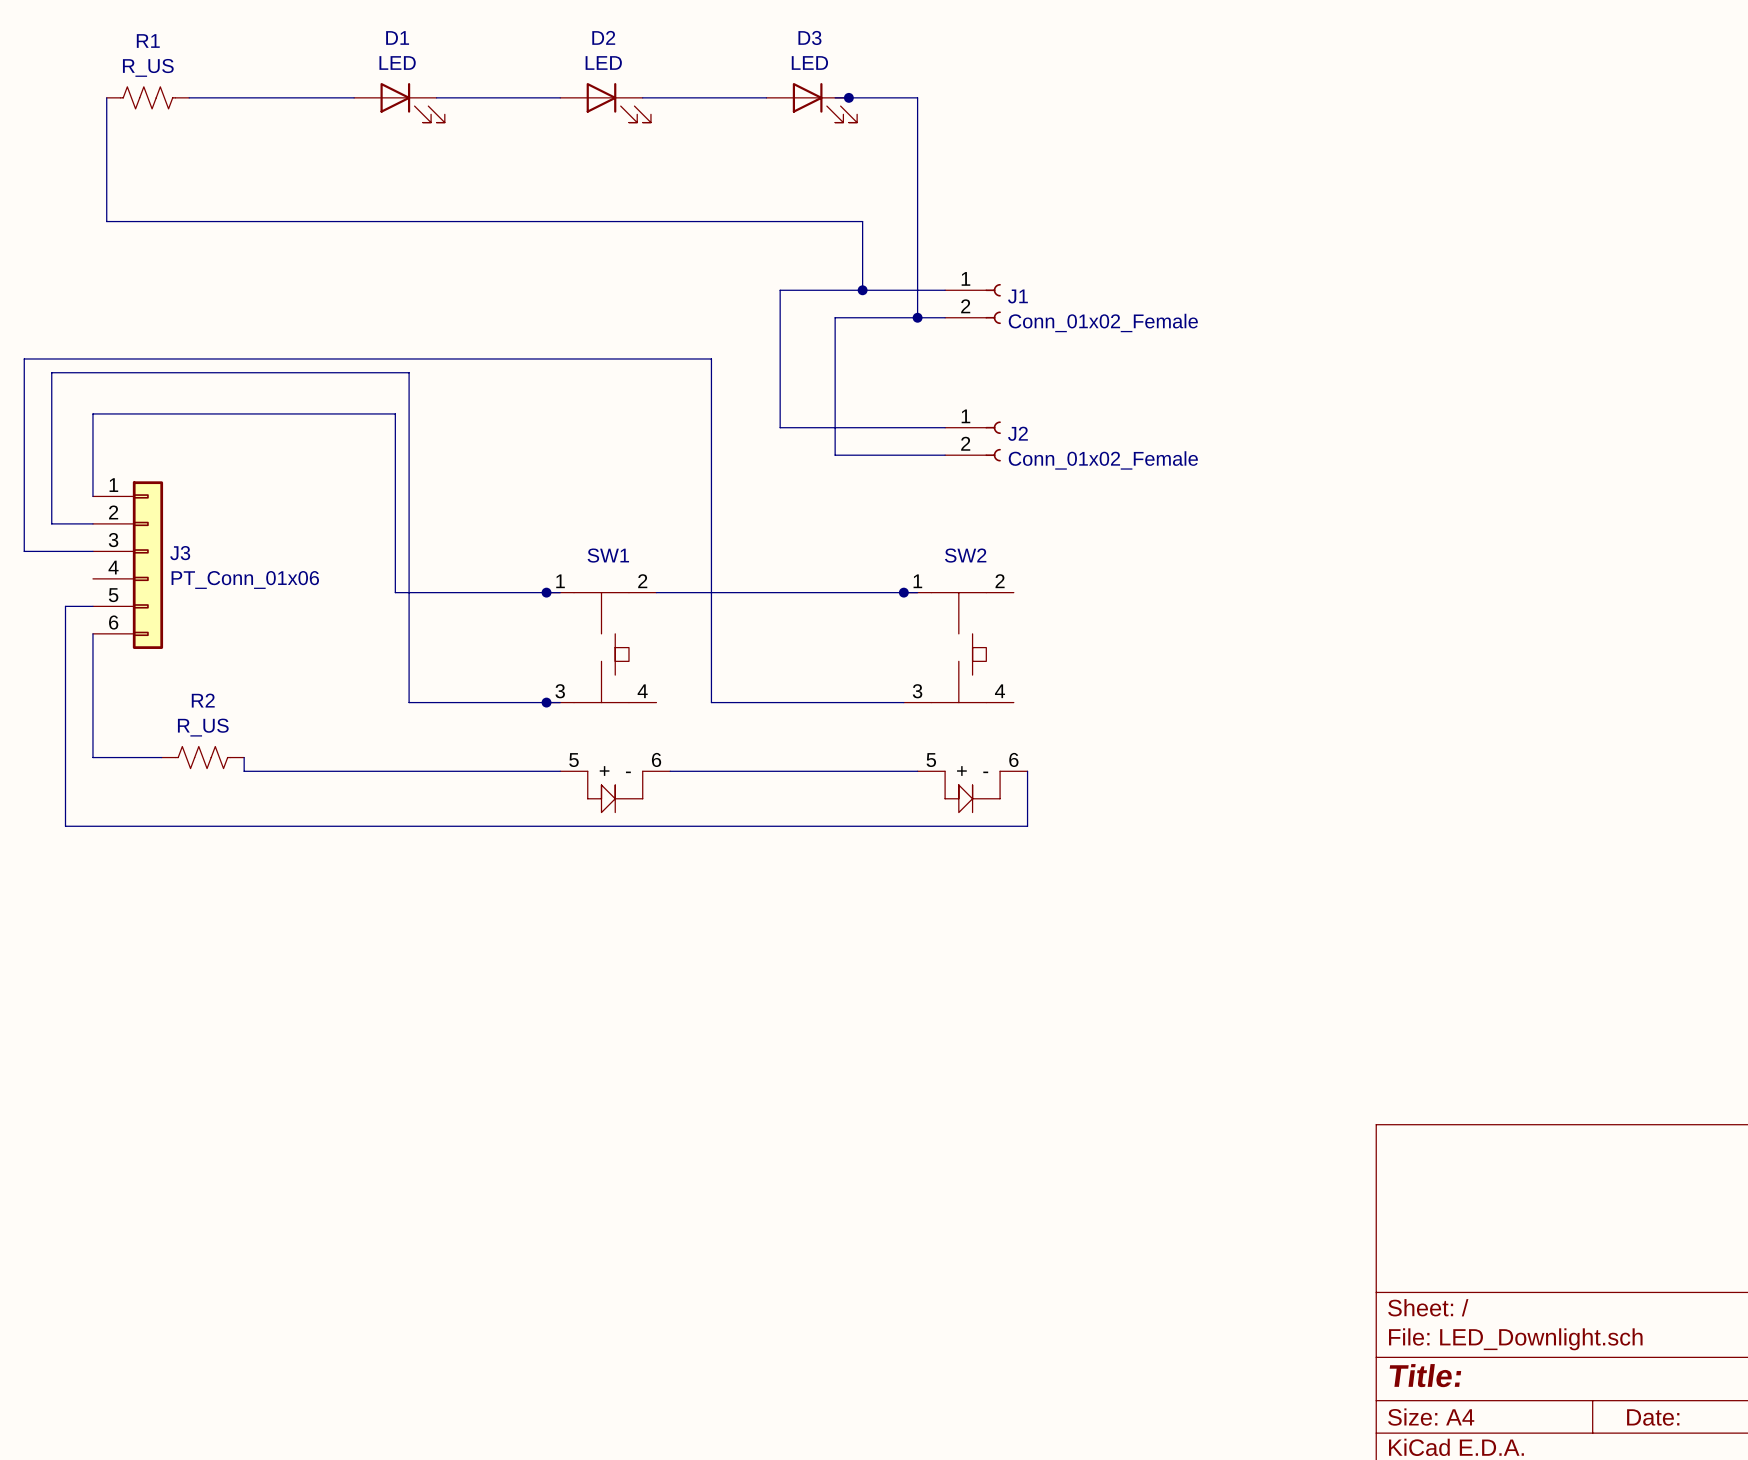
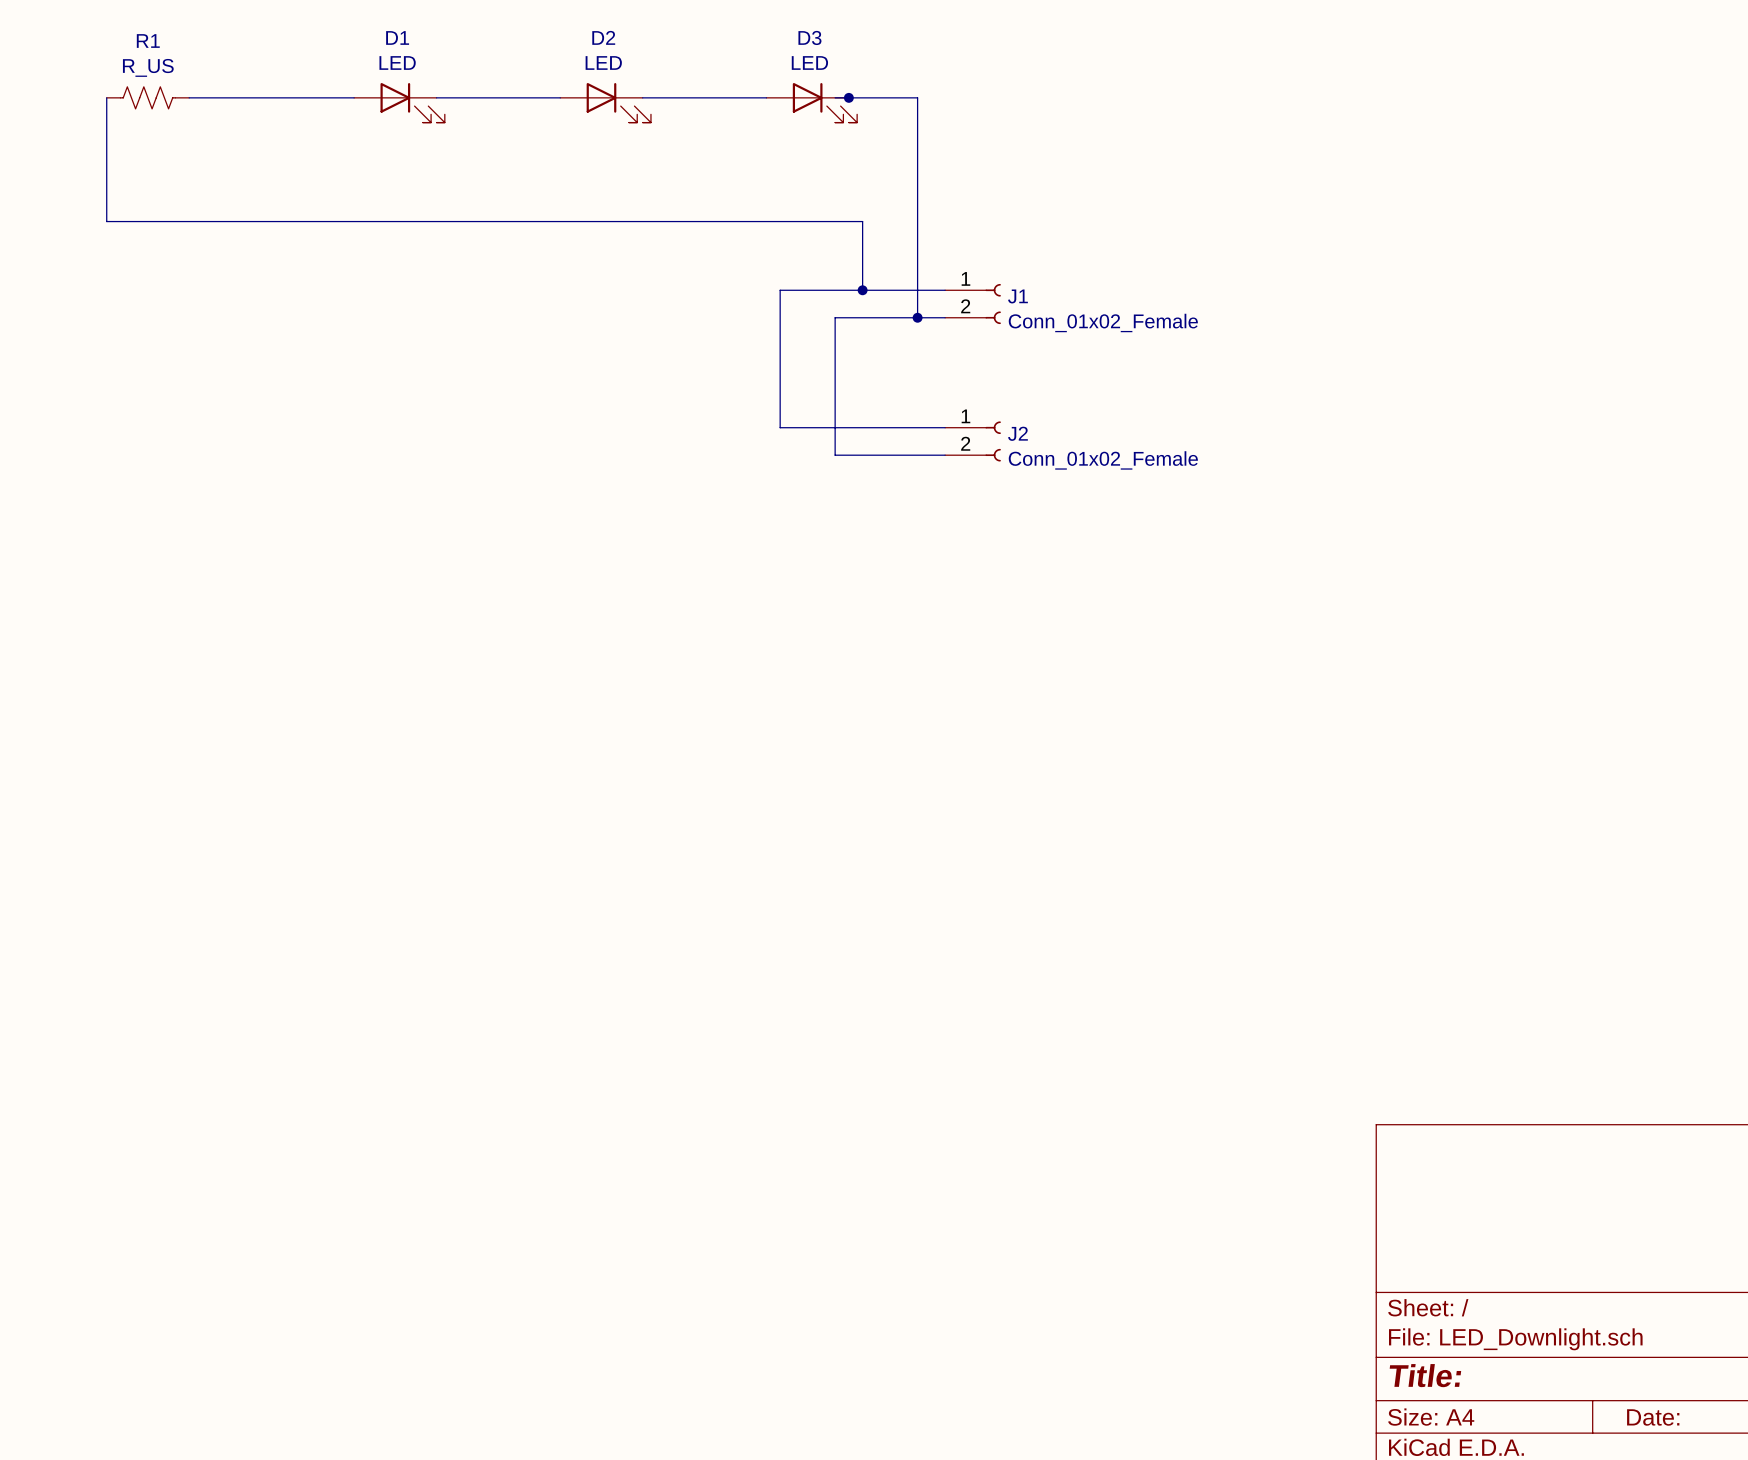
wire: (92, 496) (92, 413) (395, 413) (395, 592) (560, 592) -> none
wire: (92, 523) (51, 523) (51, 372) (409, 372) (409, 702) (560, 702) -> none
wire: (92, 551) (24, 551) (24, 358) (711, 358) (711, 702) (903, 702) -> none
J3: PT_Conn_01x06 (128, 565) -> none
junction: (546, 592) -> none
wire: (656, 592) (917, 592) -> none
junction: (903, 592) -> none
wire: (92, 606) (65, 606) (65, 826) (1027, 826) (1027, 771) -> none
wire: (92, 633) (92, 757) (161, 757) -> none
junction: (546, 702) -> none
SW1: (608, 702) -> none
SW2: (965, 702) -> none
R2: R_US (202, 757) -> none
wire: (244, 757) (244, 771) (560, 771) -> none
wire: (670, 771) (917, 771) -> none

